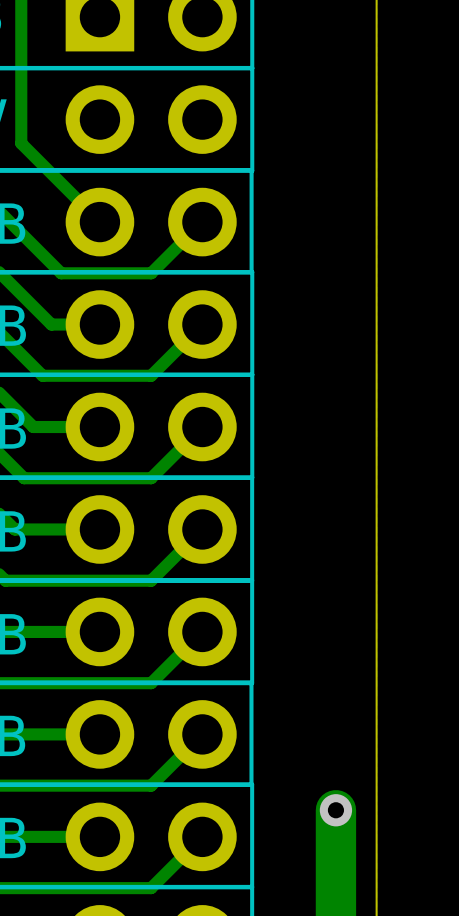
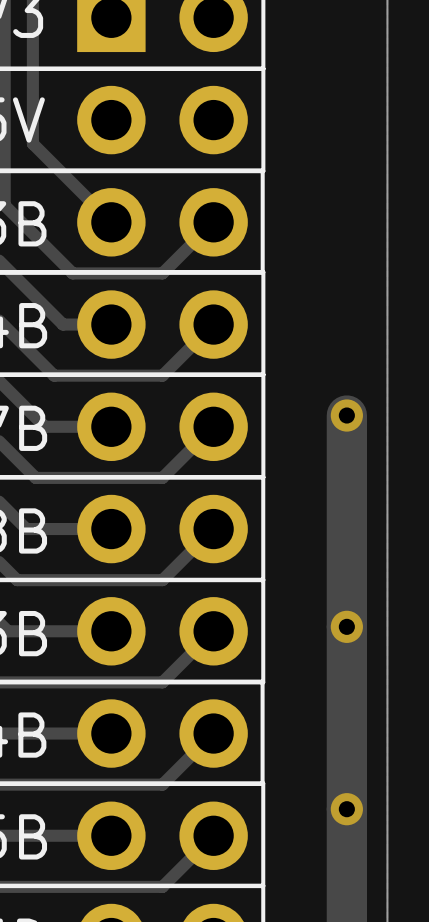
track: none -> (346, 415) (346, 809)
via: none -> (346, 415)
via: none -> (346, 626)

